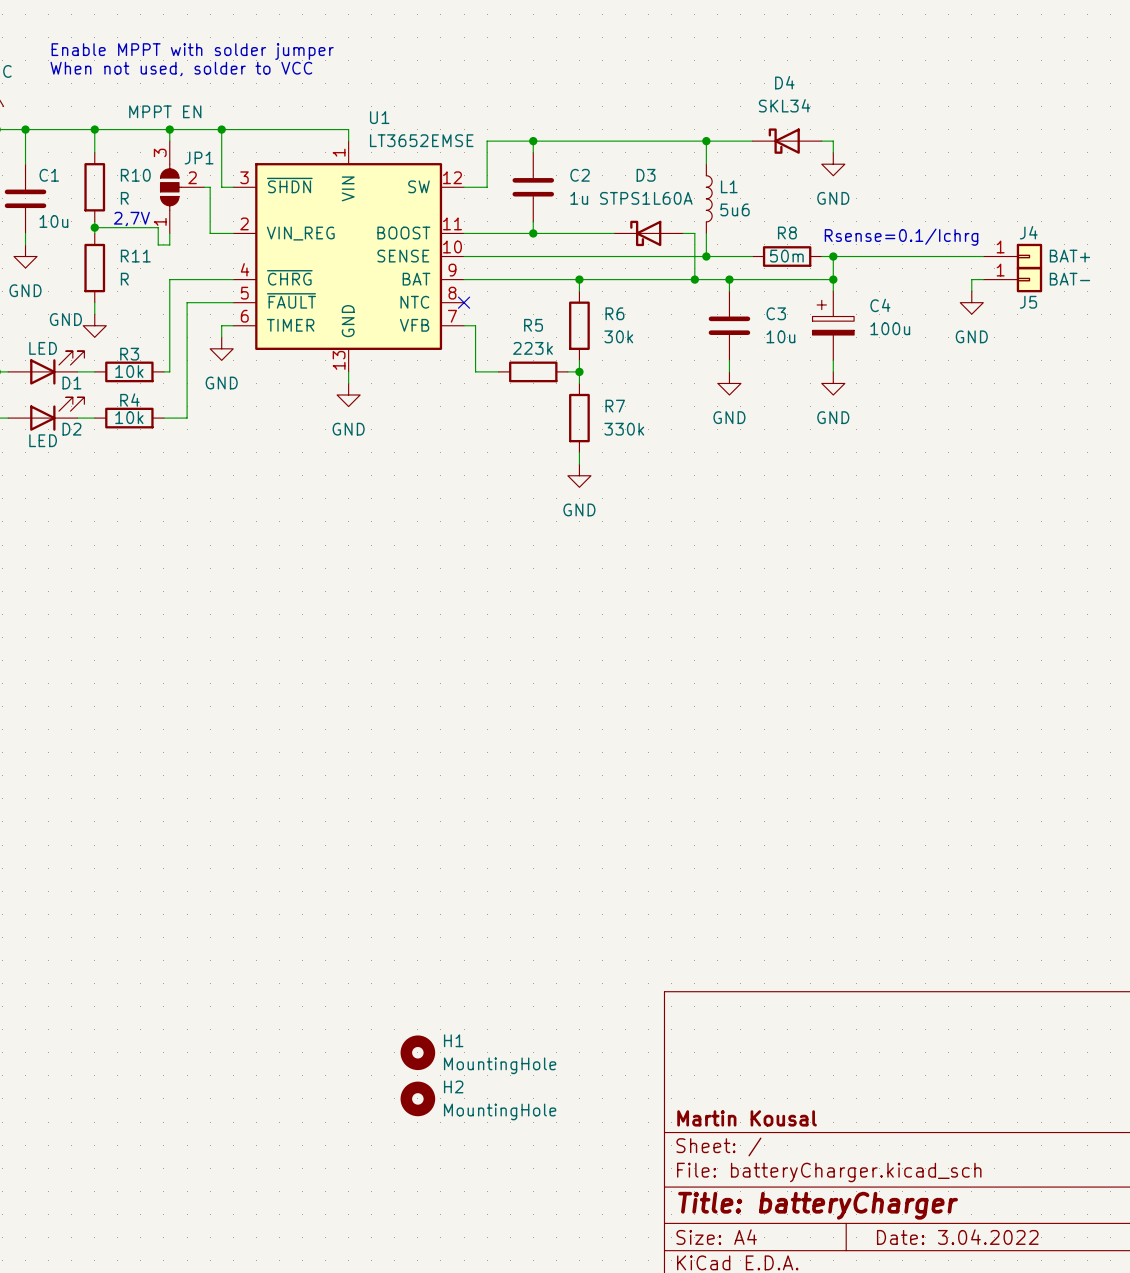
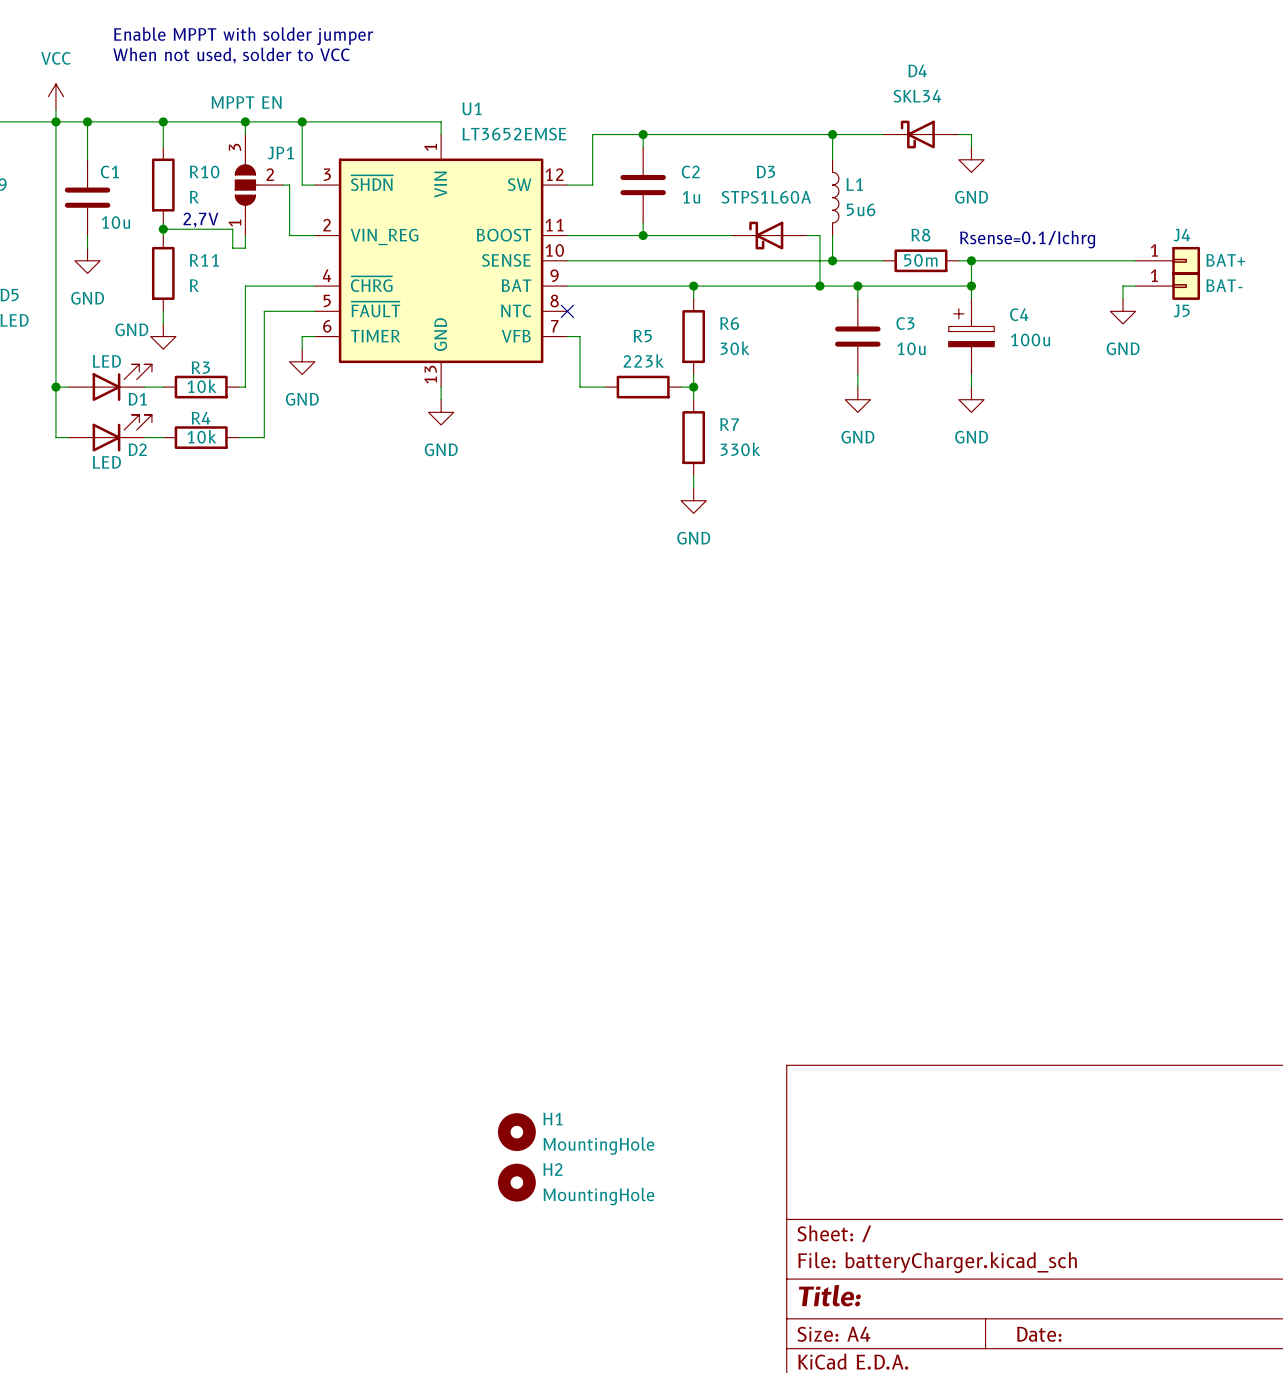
title block: Martin Kousal (747, 1118) -> none
title block: Title: batteryCharger (818, 1205) -> Title: (829, 1295)
title block: Date: 3.04.2022 (957, 1237) -> Date: (1039, 1334)

